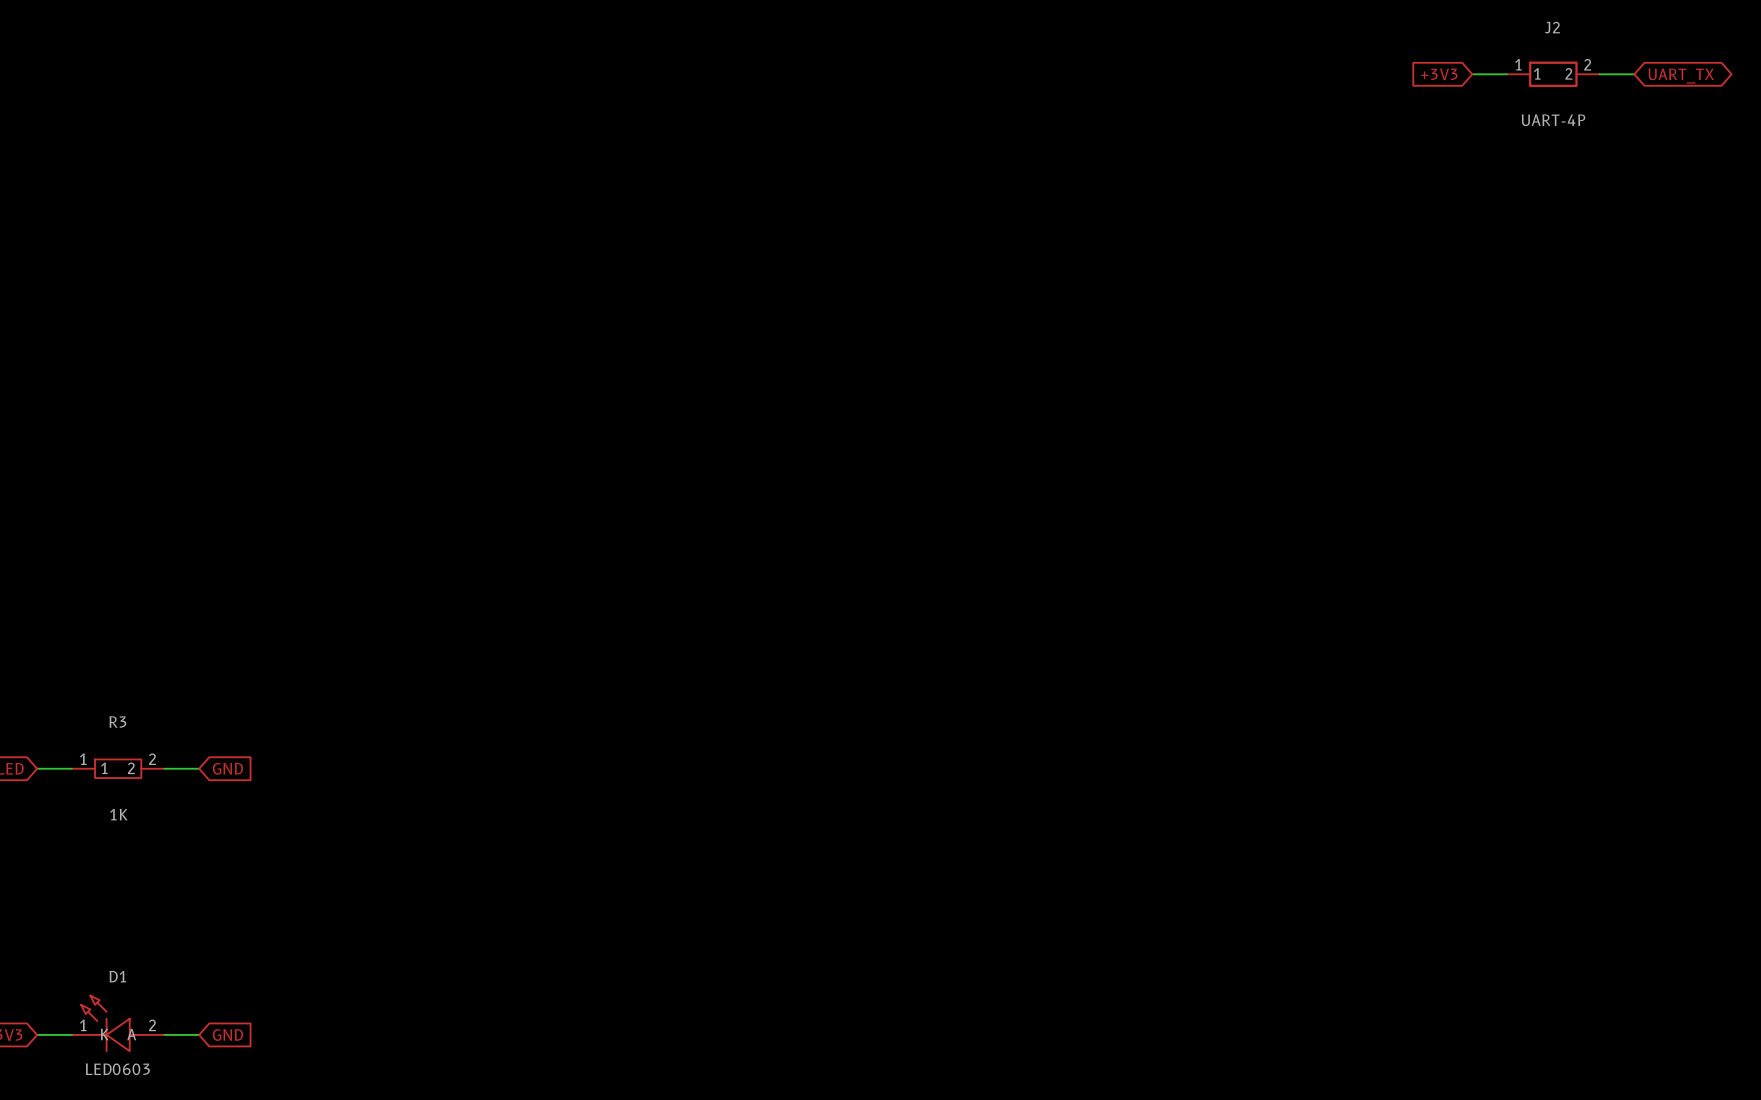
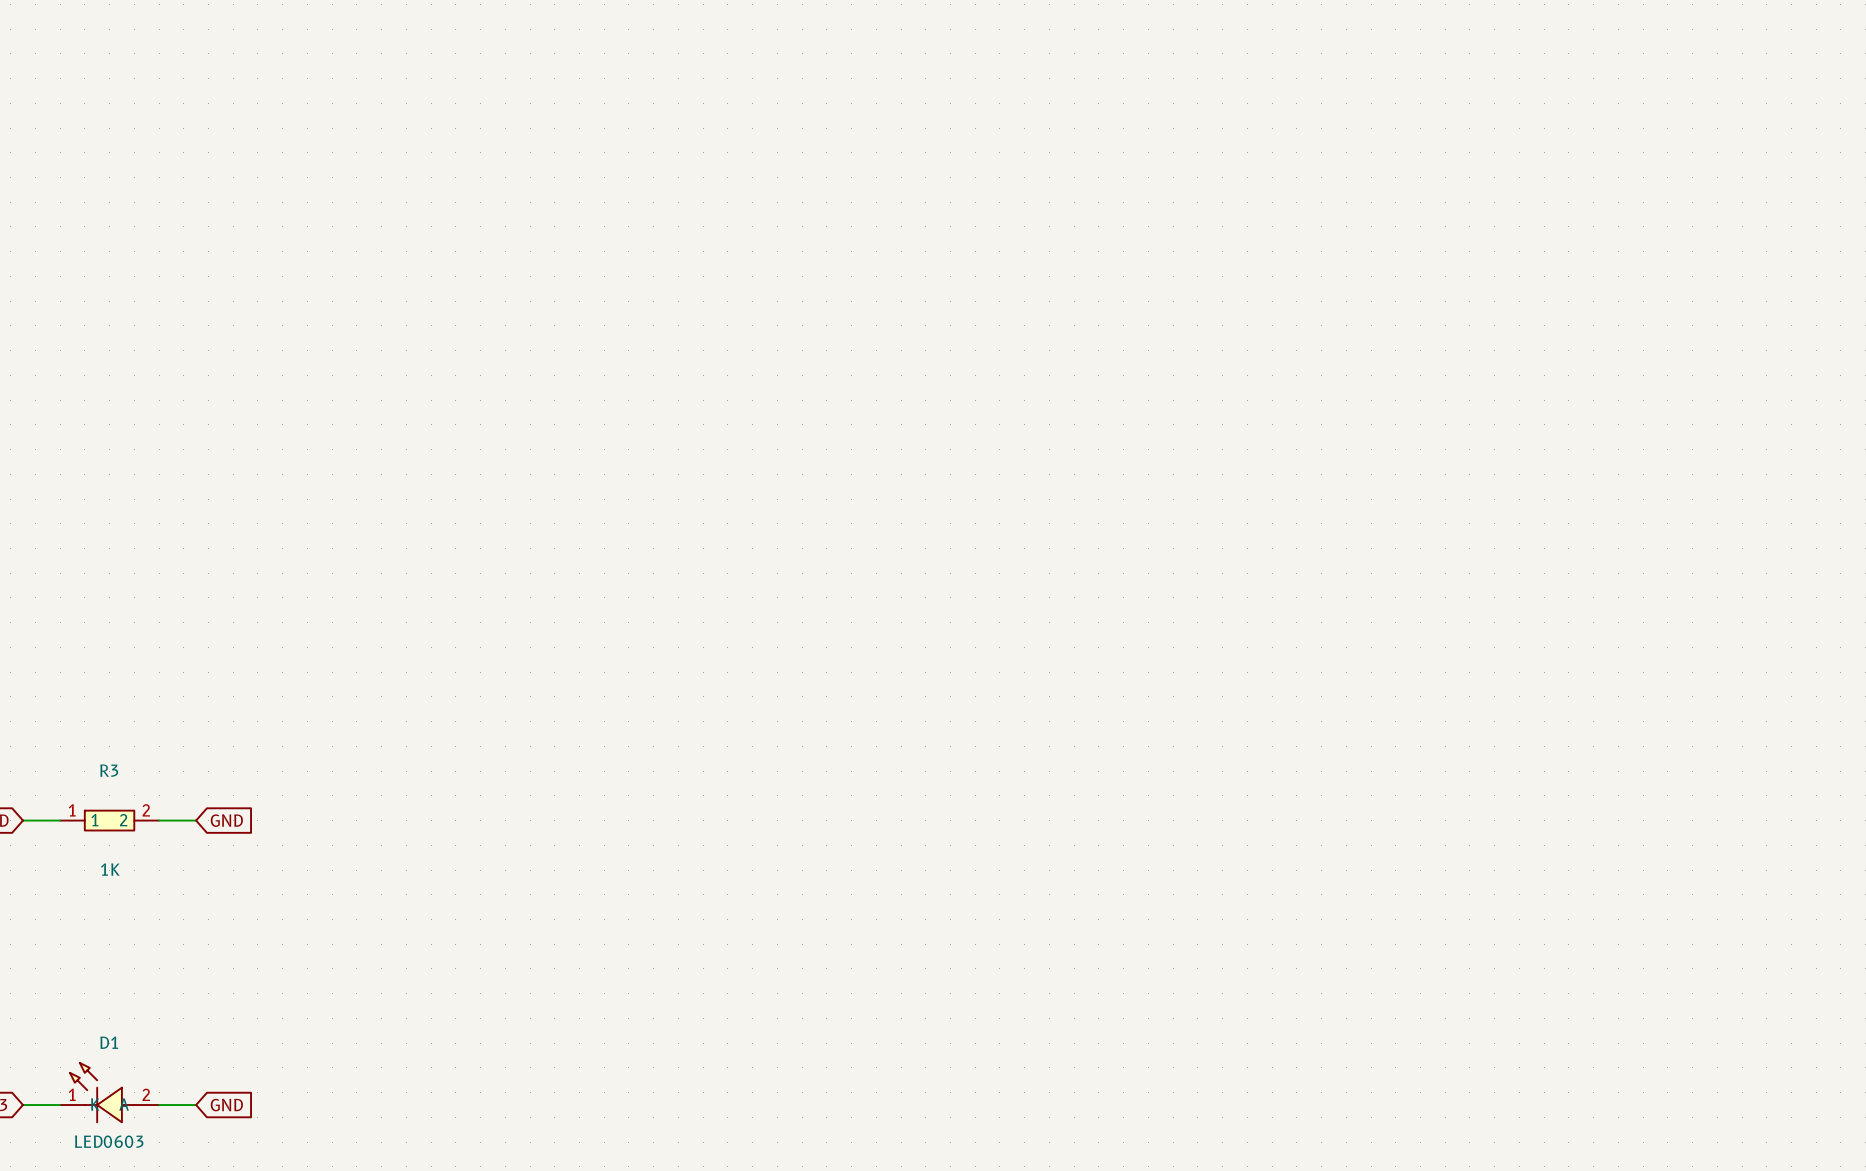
global label: +3V3 (1439, 74) -> none
wire: (1472, 74) (1507, 74) -> none
J2: UART-4P (1553, 74) -> none
wire: (1599, 74) (1634, 74) -> none
global label: UART_TX (1681, 76) -> none

